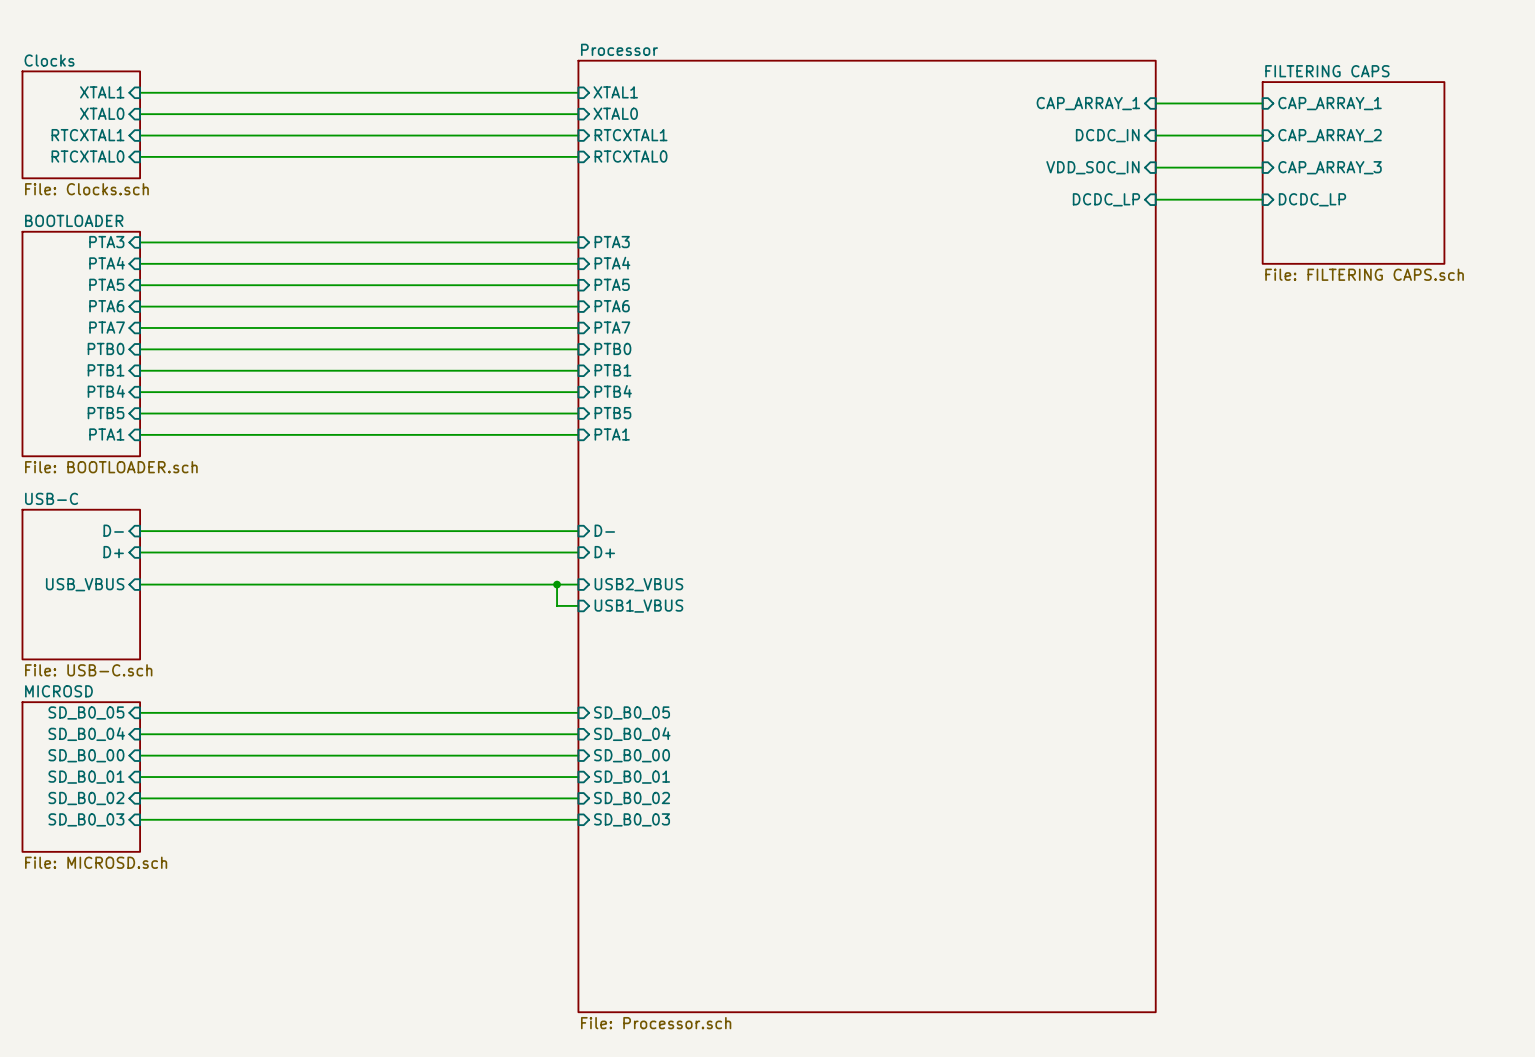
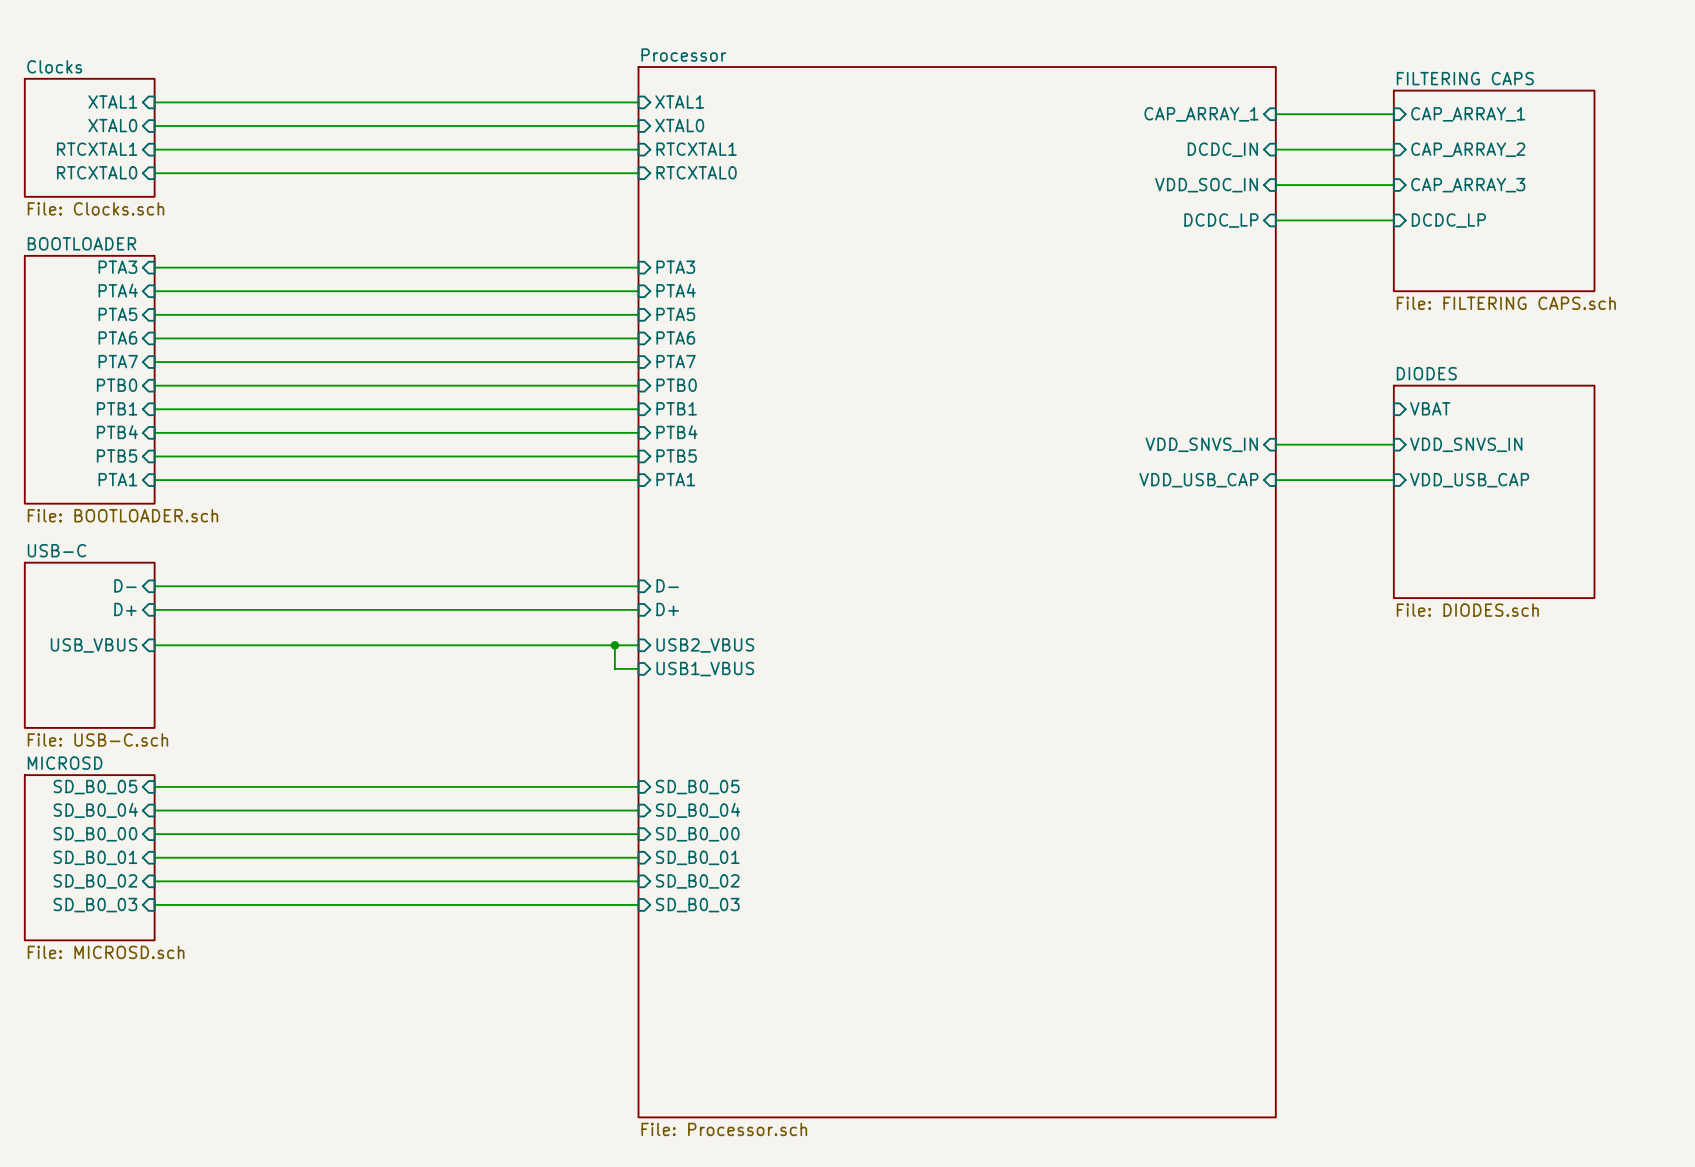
sheet pin: none -> VBAT (1430, 408)
sheet pin: none -> VDD_SNVS_IN (1201, 444)
wire: none -> (1275, 444) (1393, 444)
sheet pin: none -> VDD_SNVS_IN (1466, 444)
wire: none -> (1275, 480) (1393, 480)
sheet pin: none -> VDD_USB_CAP (1198, 480)
sheet pin: none -> VDD_USB_CAP (1469, 480)
sheet DIODES: none -> File: DIODES.sch (1494, 491)

